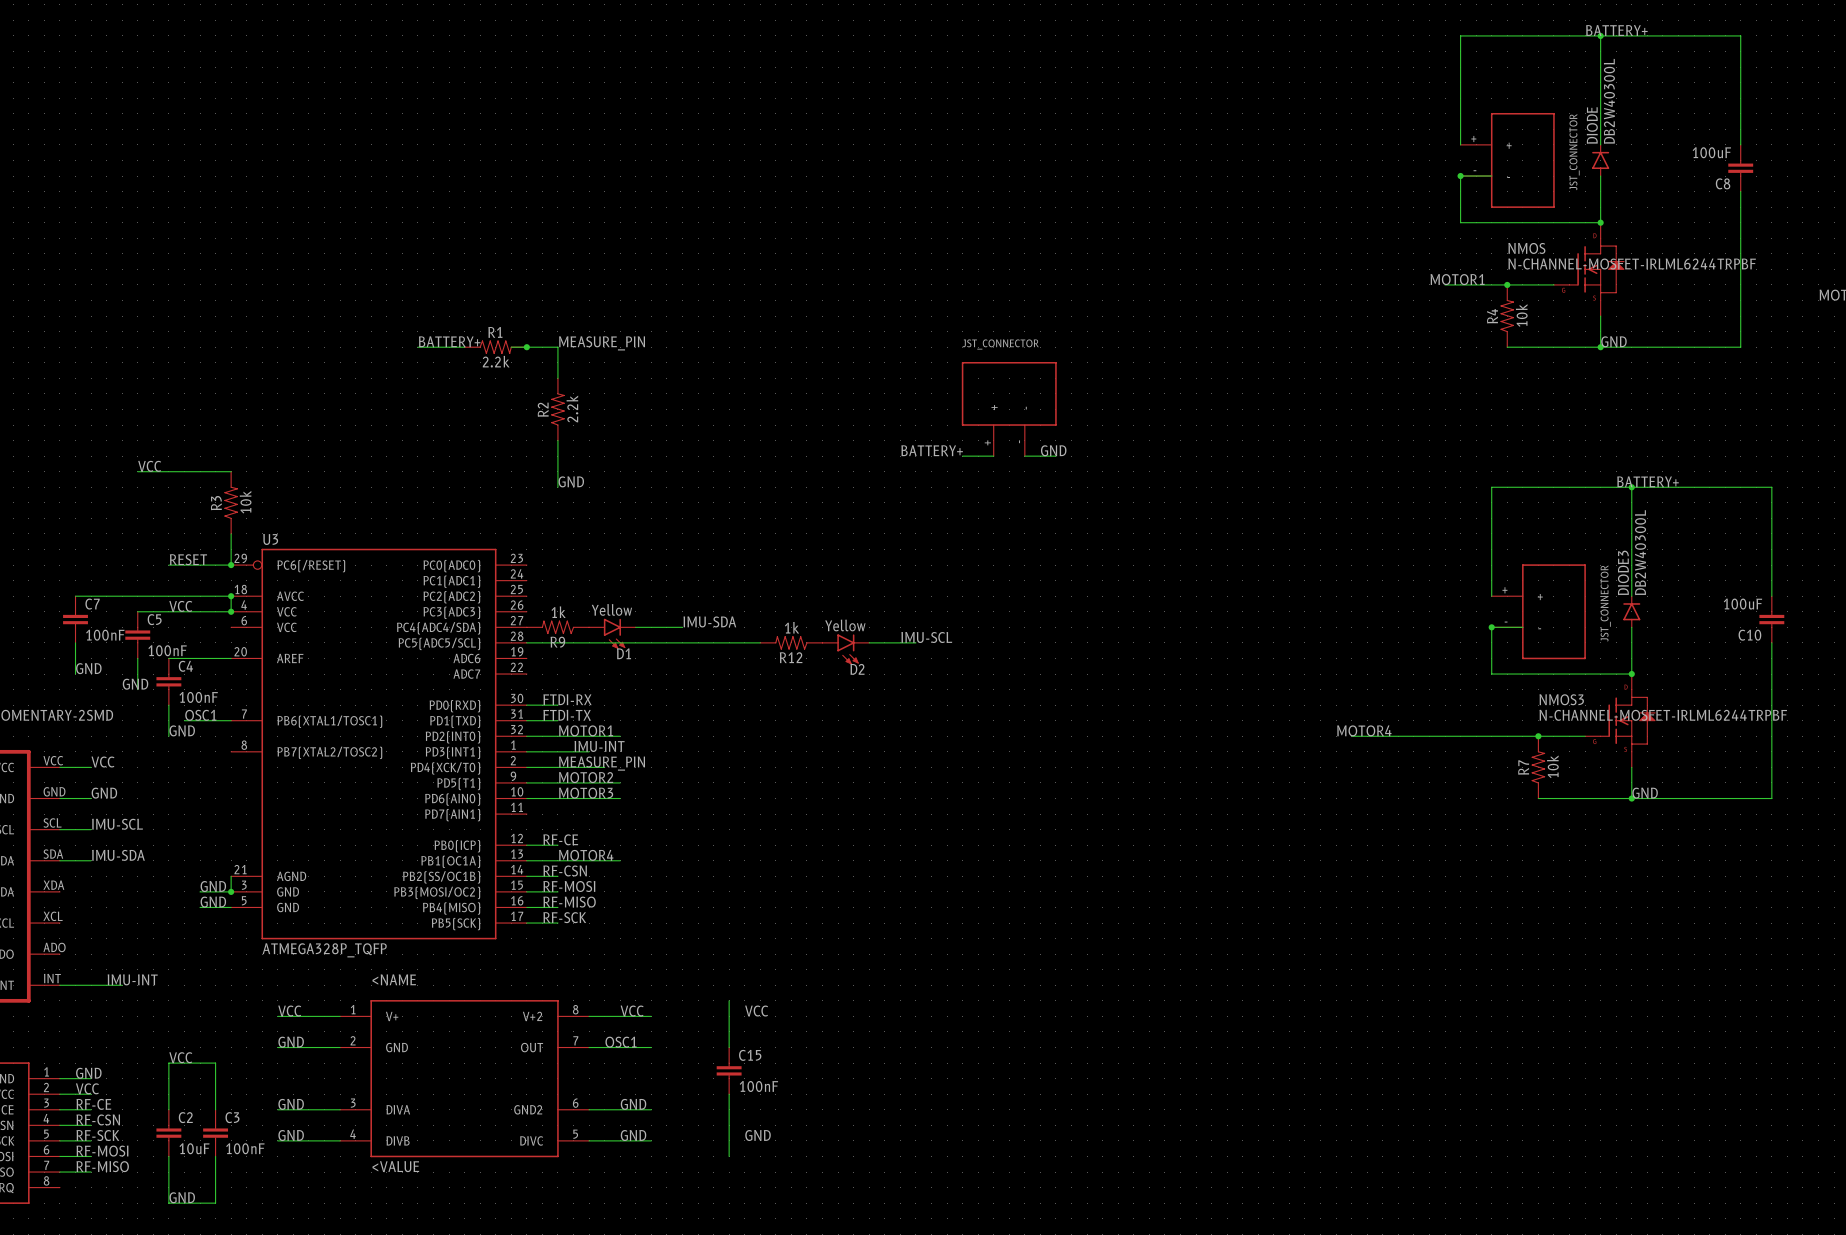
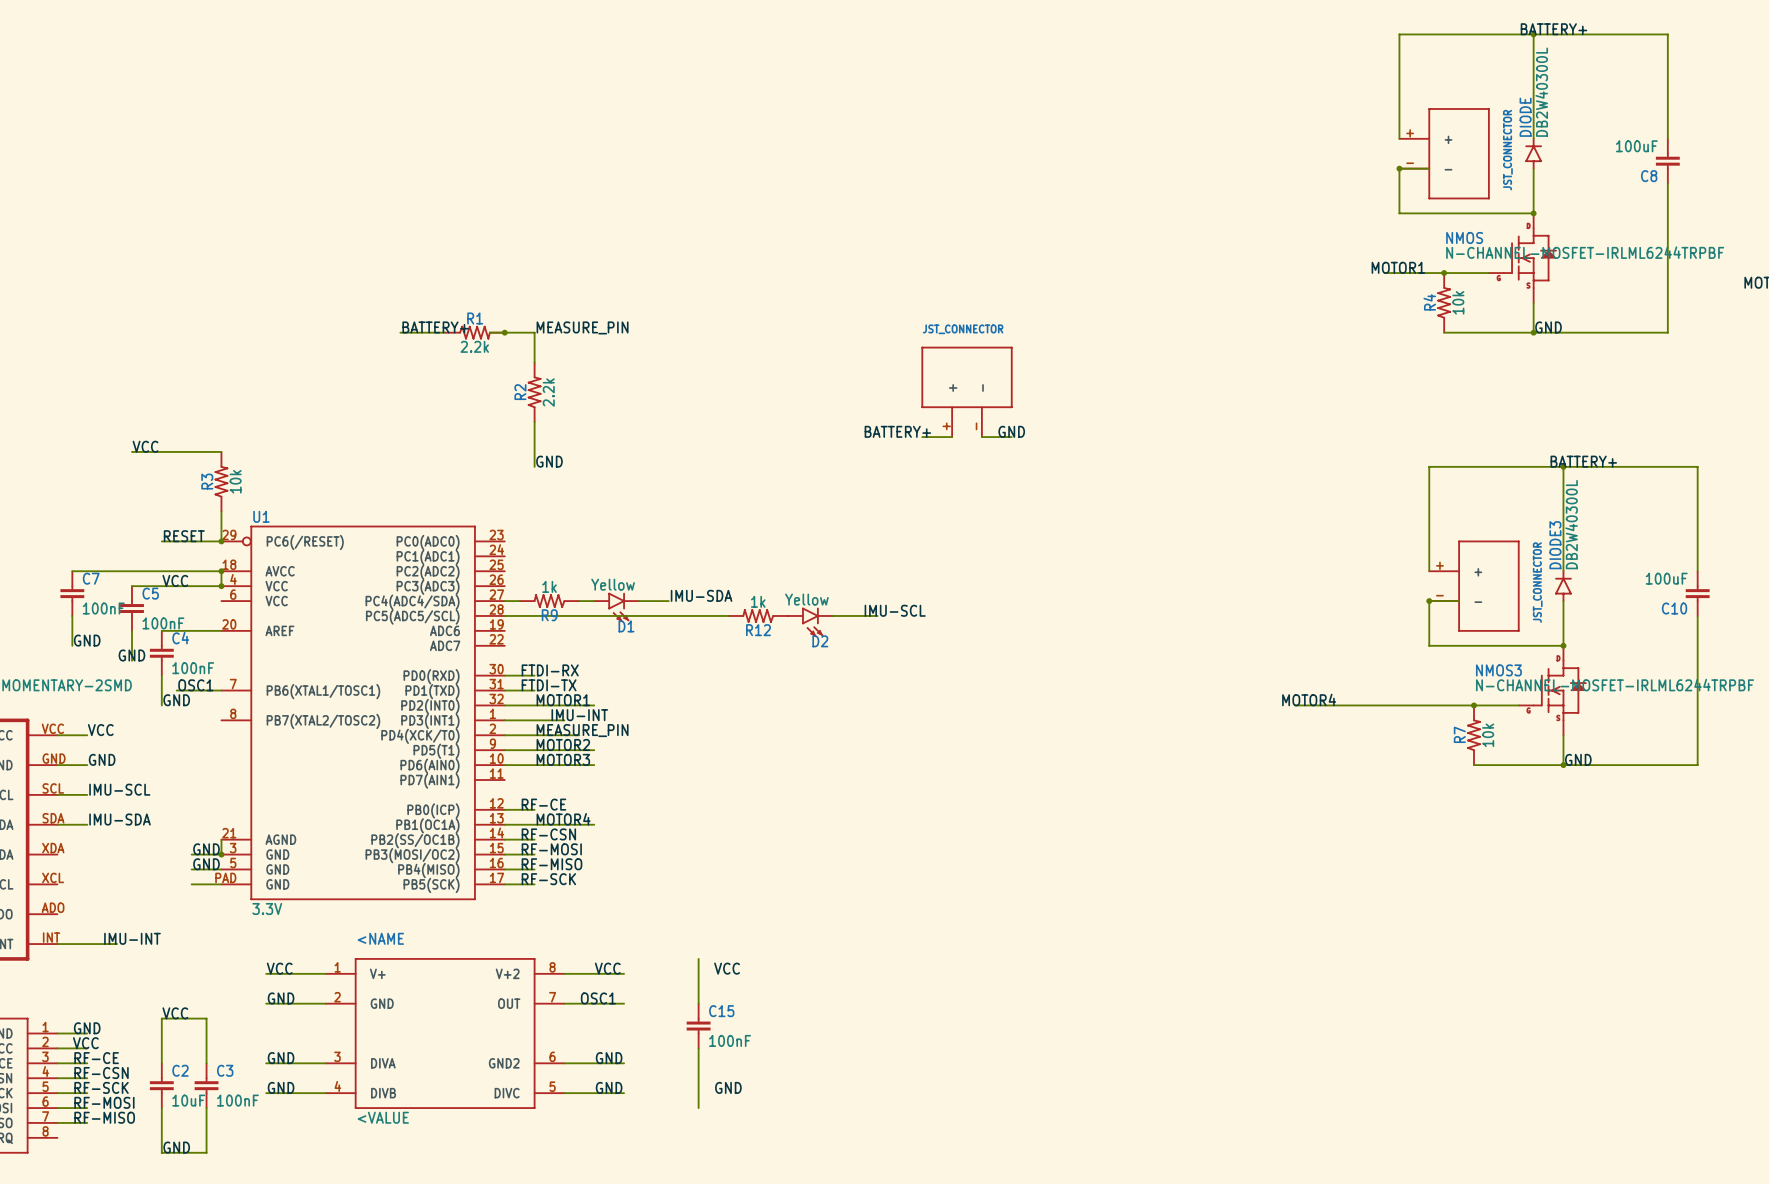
label position: IMU-SDA (709, 621) -> IMU-SDA (701, 595)
R9 position: (557, 627) -> (549, 601)
wire: none -> (579, 601) (594, 601)
wire: none -> (653, 601) (668, 601)
D1 position: (612, 633) -> (616, 607)
U3: ATMEGA328P_TQFP (378, 744) -> none
U1: none -> 3.3V (363, 712)
wire: none -> (191, 884) (221, 884)

